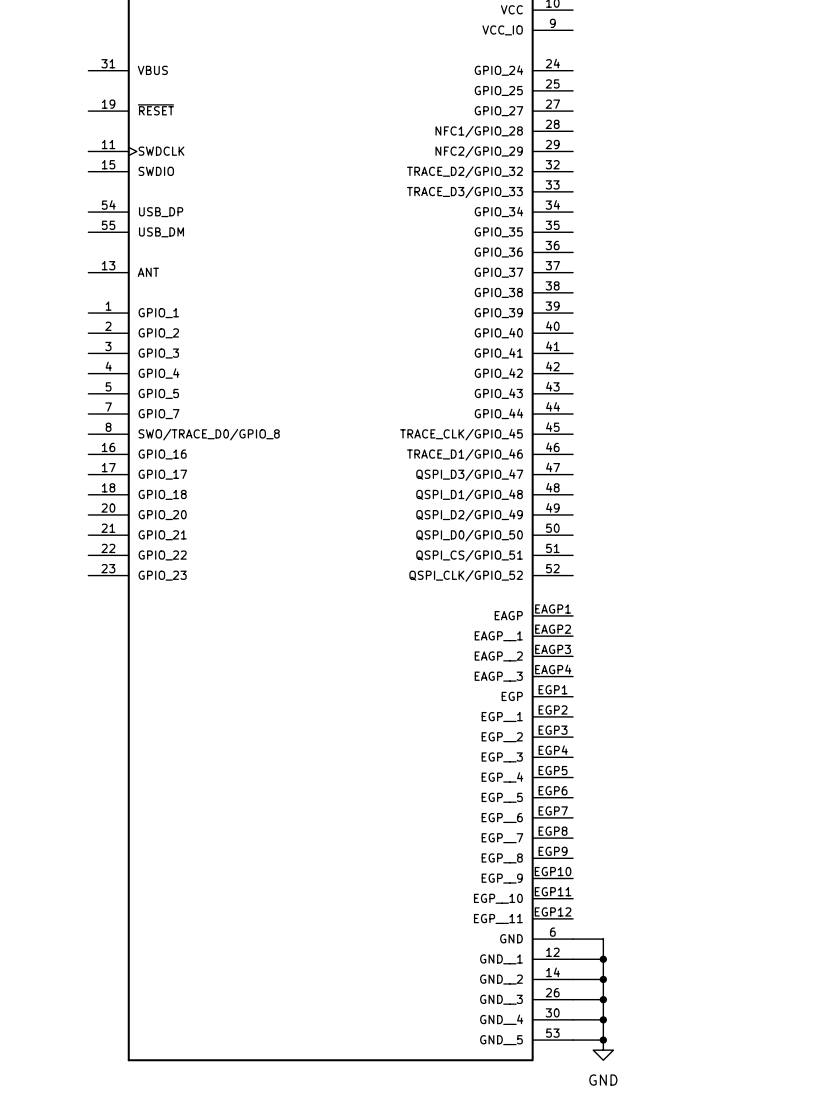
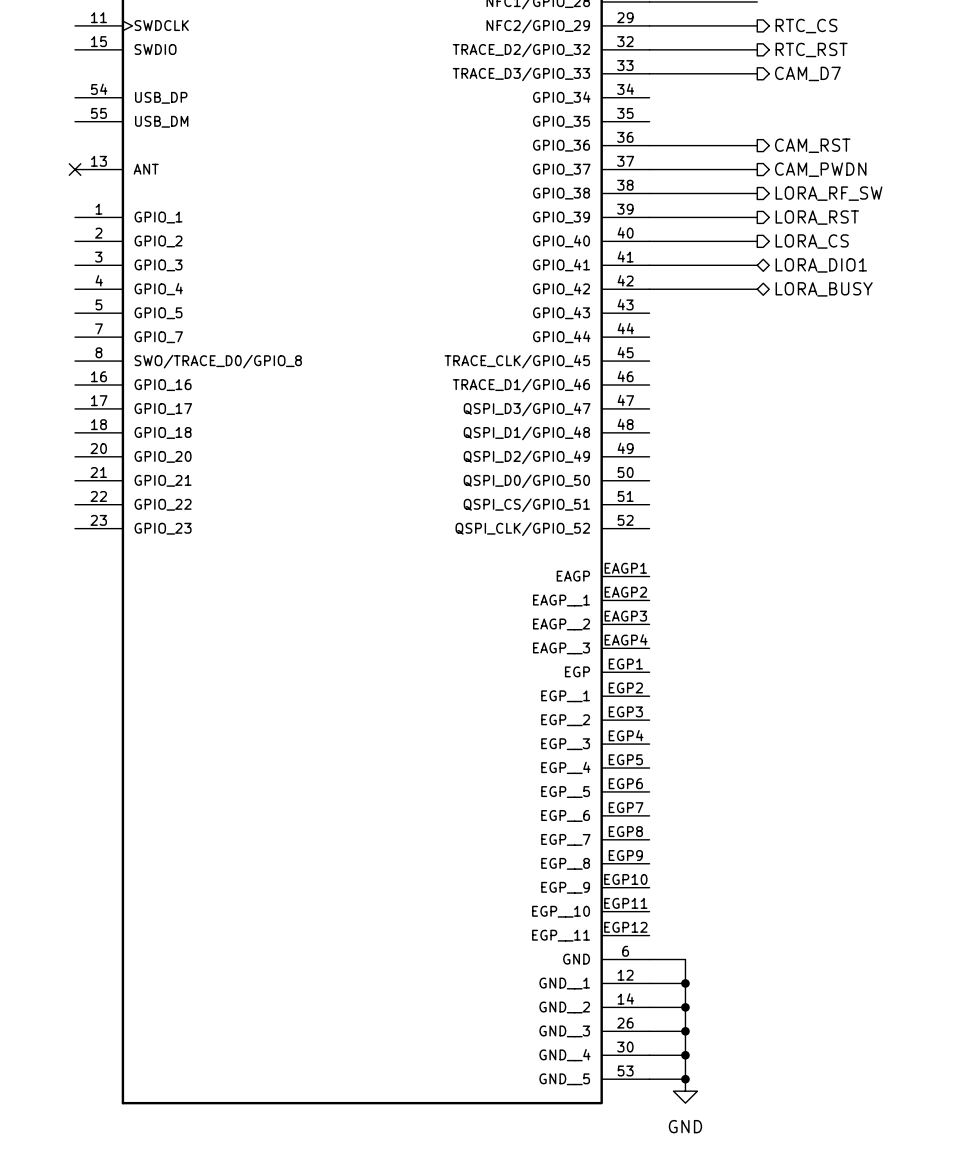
wire: none -> (649, 1) (757, 1)
wire: none -> (649, 25) (757, 25)
hierarchical label: none -> RTC_CS (806, 26)
wire: none -> (649, 49) (757, 49)
hierarchical label: none -> RTC_RST (811, 49)
wire: none -> (649, 73) (757, 73)
hierarchical label: none -> CAM_D7 (807, 73)
wire: none -> (649, 145) (757, 145)
hierarchical label: none -> CAM_RST (812, 145)
no-connect mark: none -> (75, 169)
wire: none -> (649, 169) (757, 169)
hierarchical label: none -> CAM_PWDN (820, 169)
wire: none -> (649, 193) (757, 193)
hierarchical label: none -> LORA_RF_SW (828, 193)
wire: none -> (649, 217) (757, 217)
hierarchical label: none -> LORA_RST (817, 217)
wire: none -> (649, 241) (757, 241)
hierarchical label: none -> LORA_CS (812, 241)
wire: none -> (649, 265) (757, 265)
hierarchical label: none -> LORA_DIO1 (821, 265)
wire: none -> (649, 289) (757, 289)
hierarchical label: none -> LORA_BUSY (824, 289)

